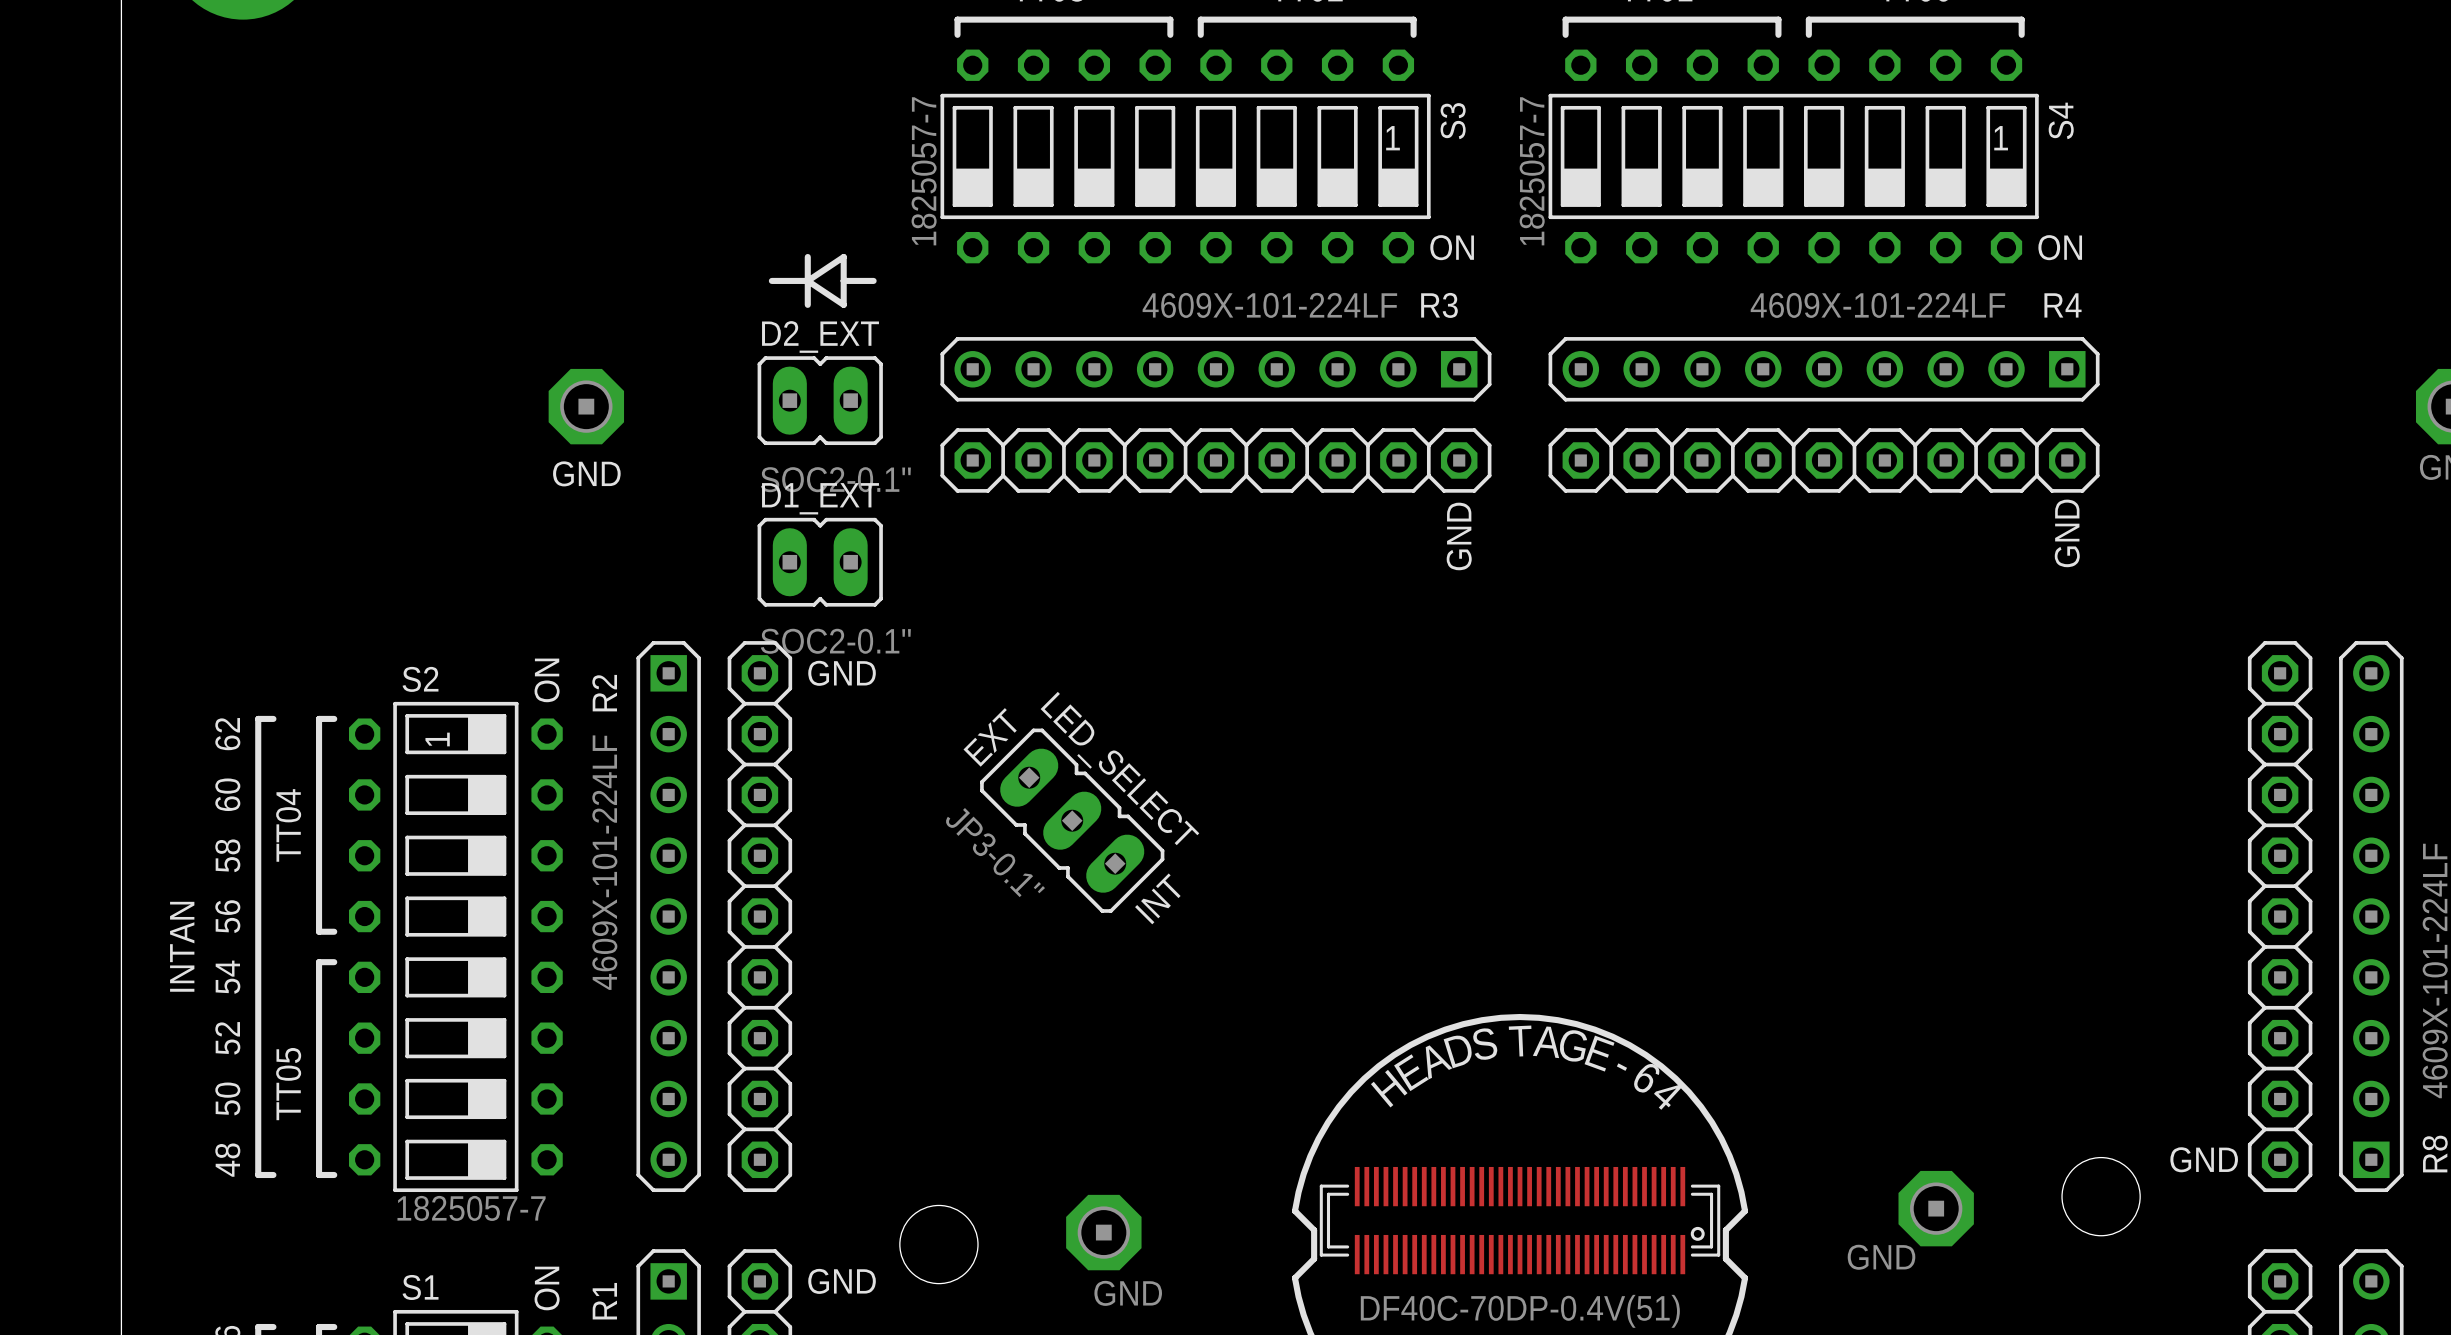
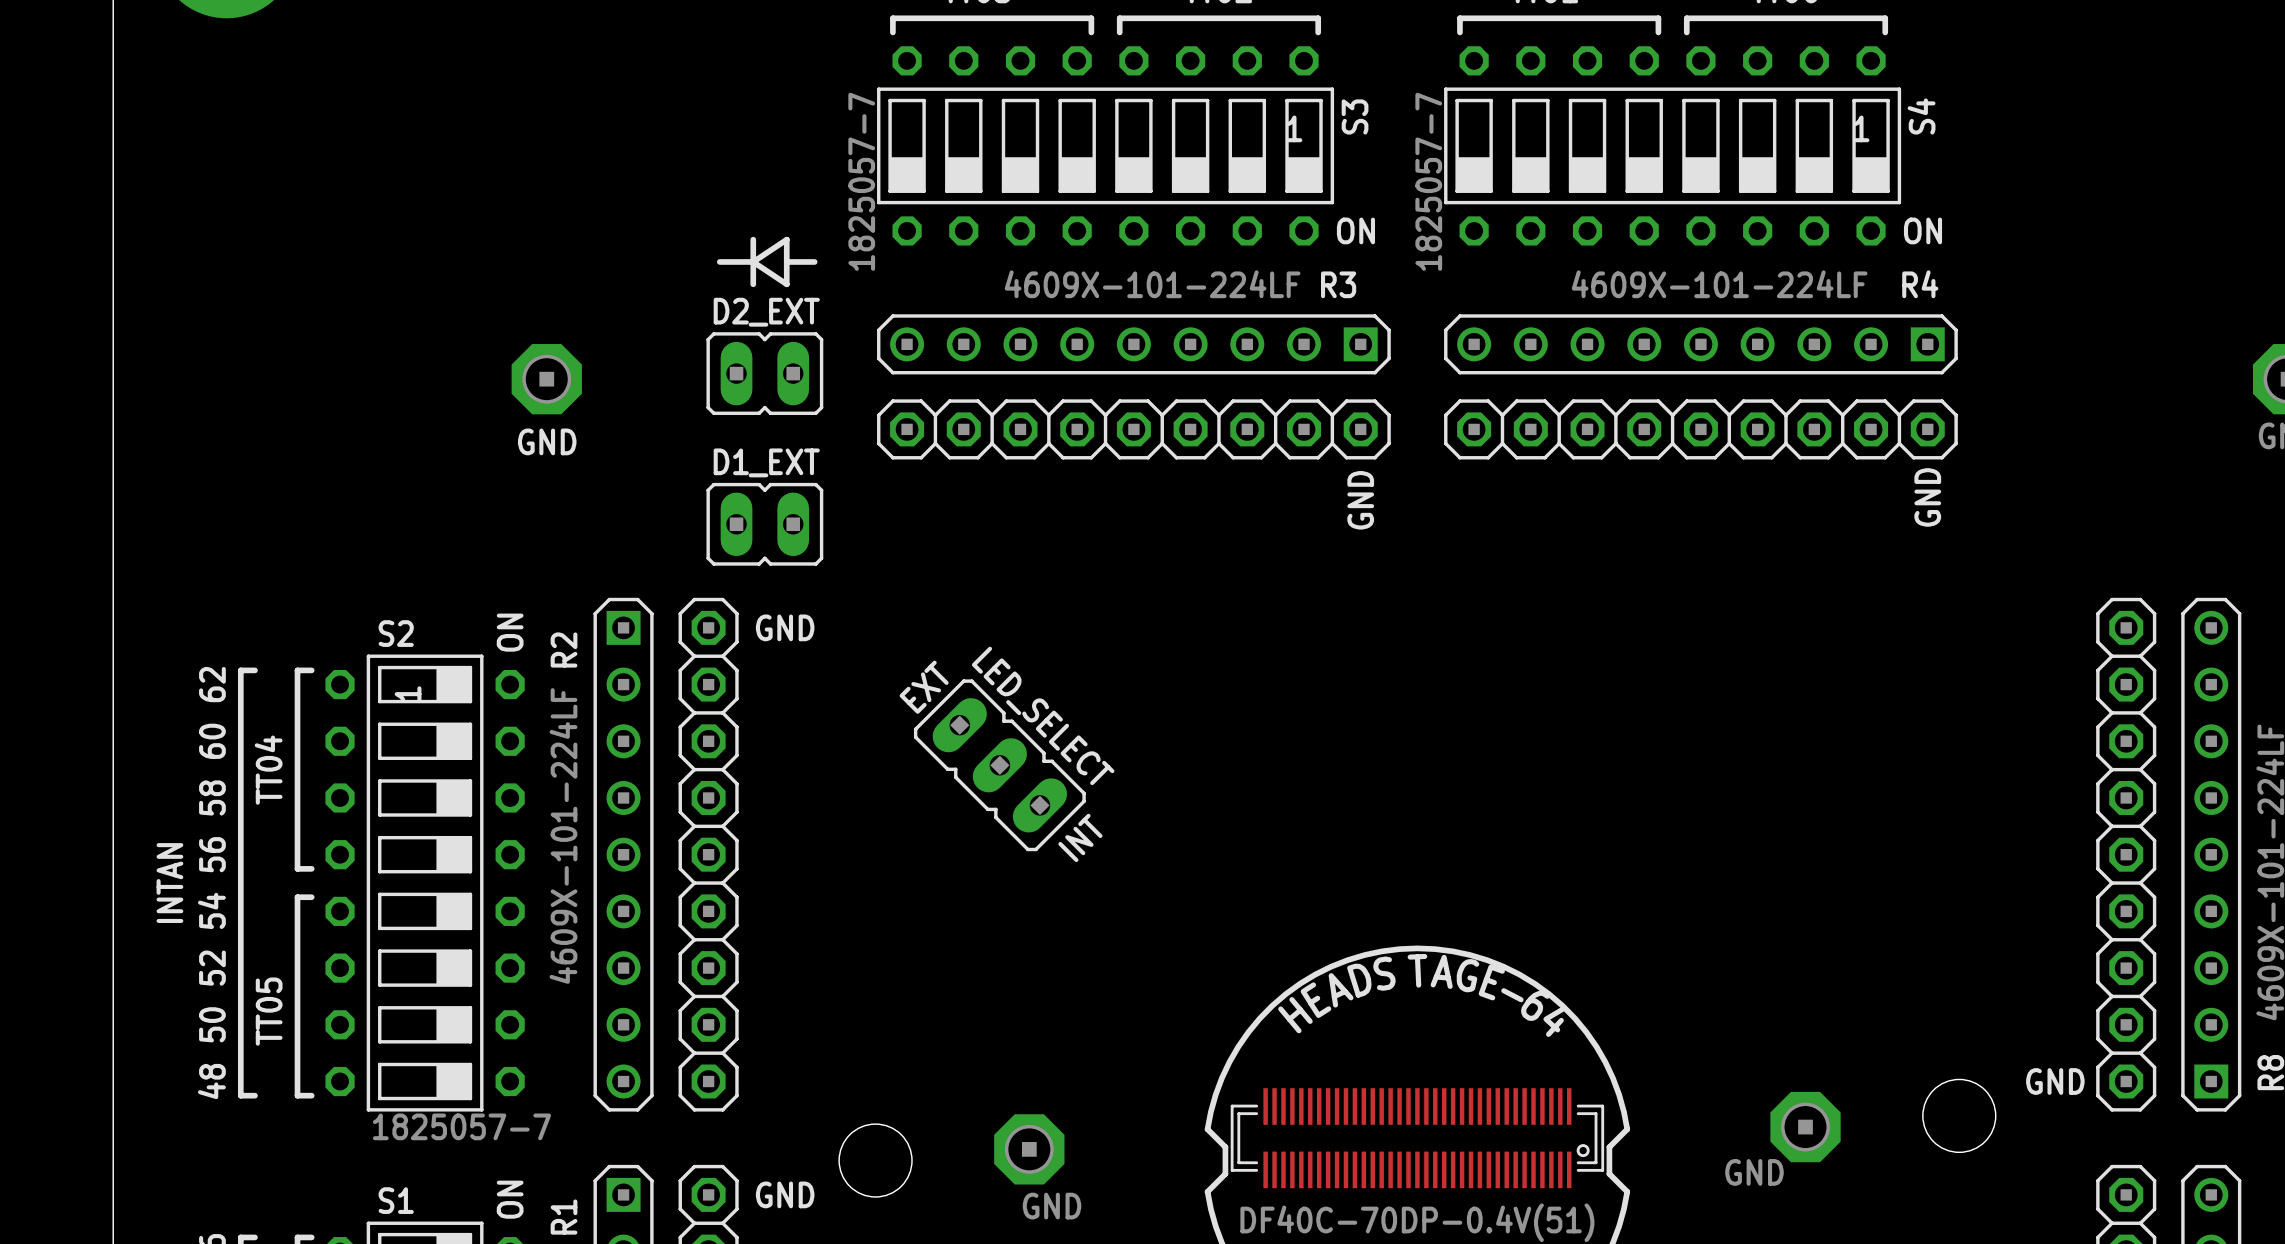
D2_EXT value: SOC2-0.1" (835, 479) -> none
D1_EXT value: SOC2-0.1" (835, 641) -> none
LED_SELECT value: JP3-0.1" (994, 852) -> none

